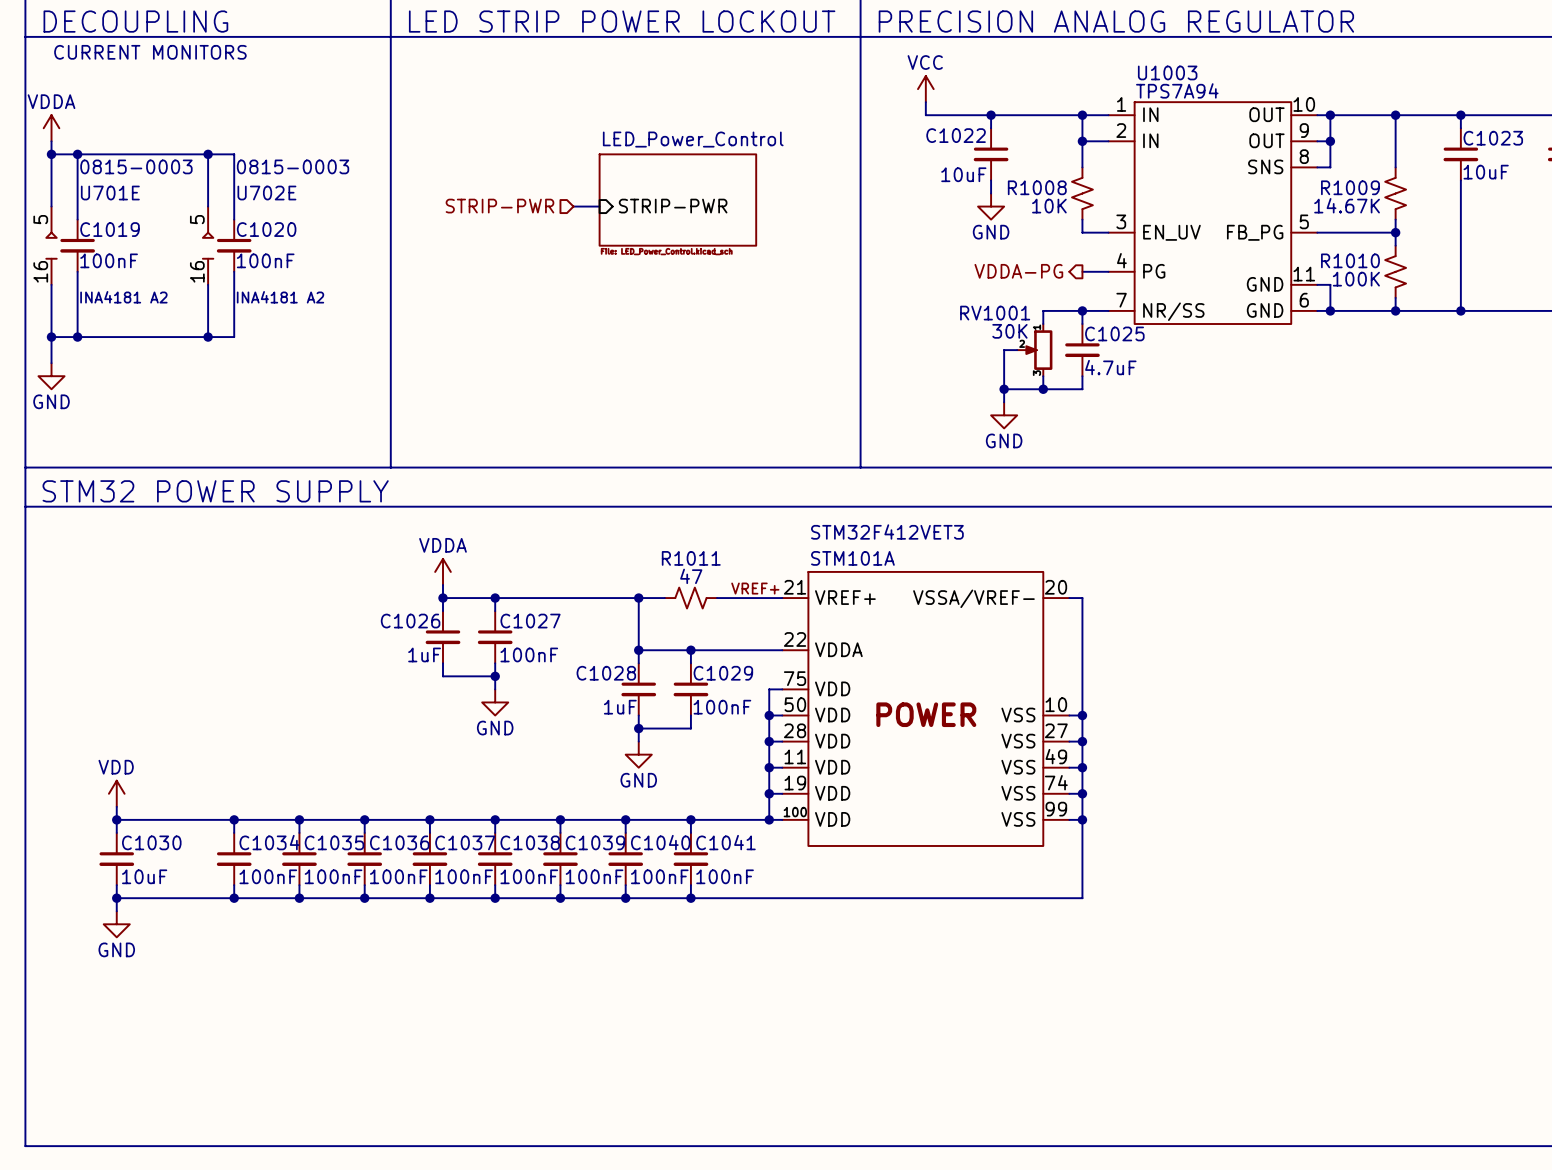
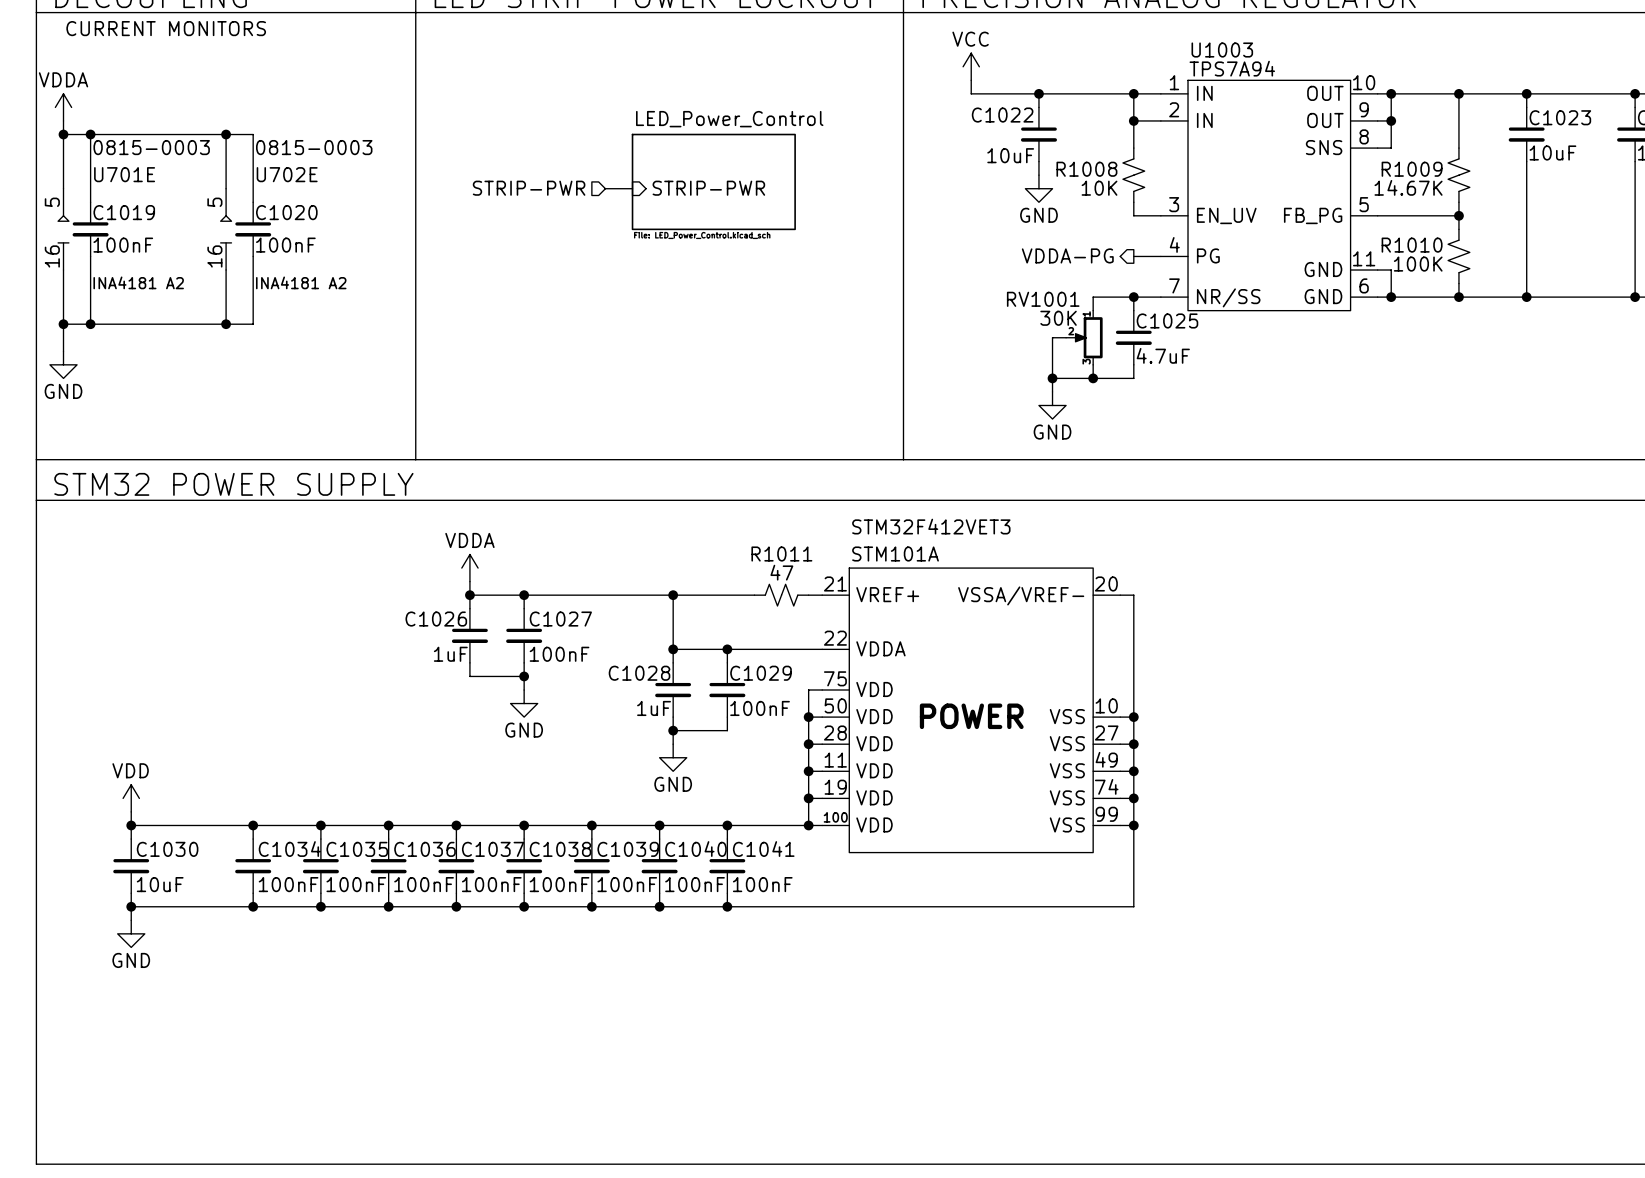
label: VREF+ (755, 588) -> none
R1011 position: (690, 598) -> (781, 595)

